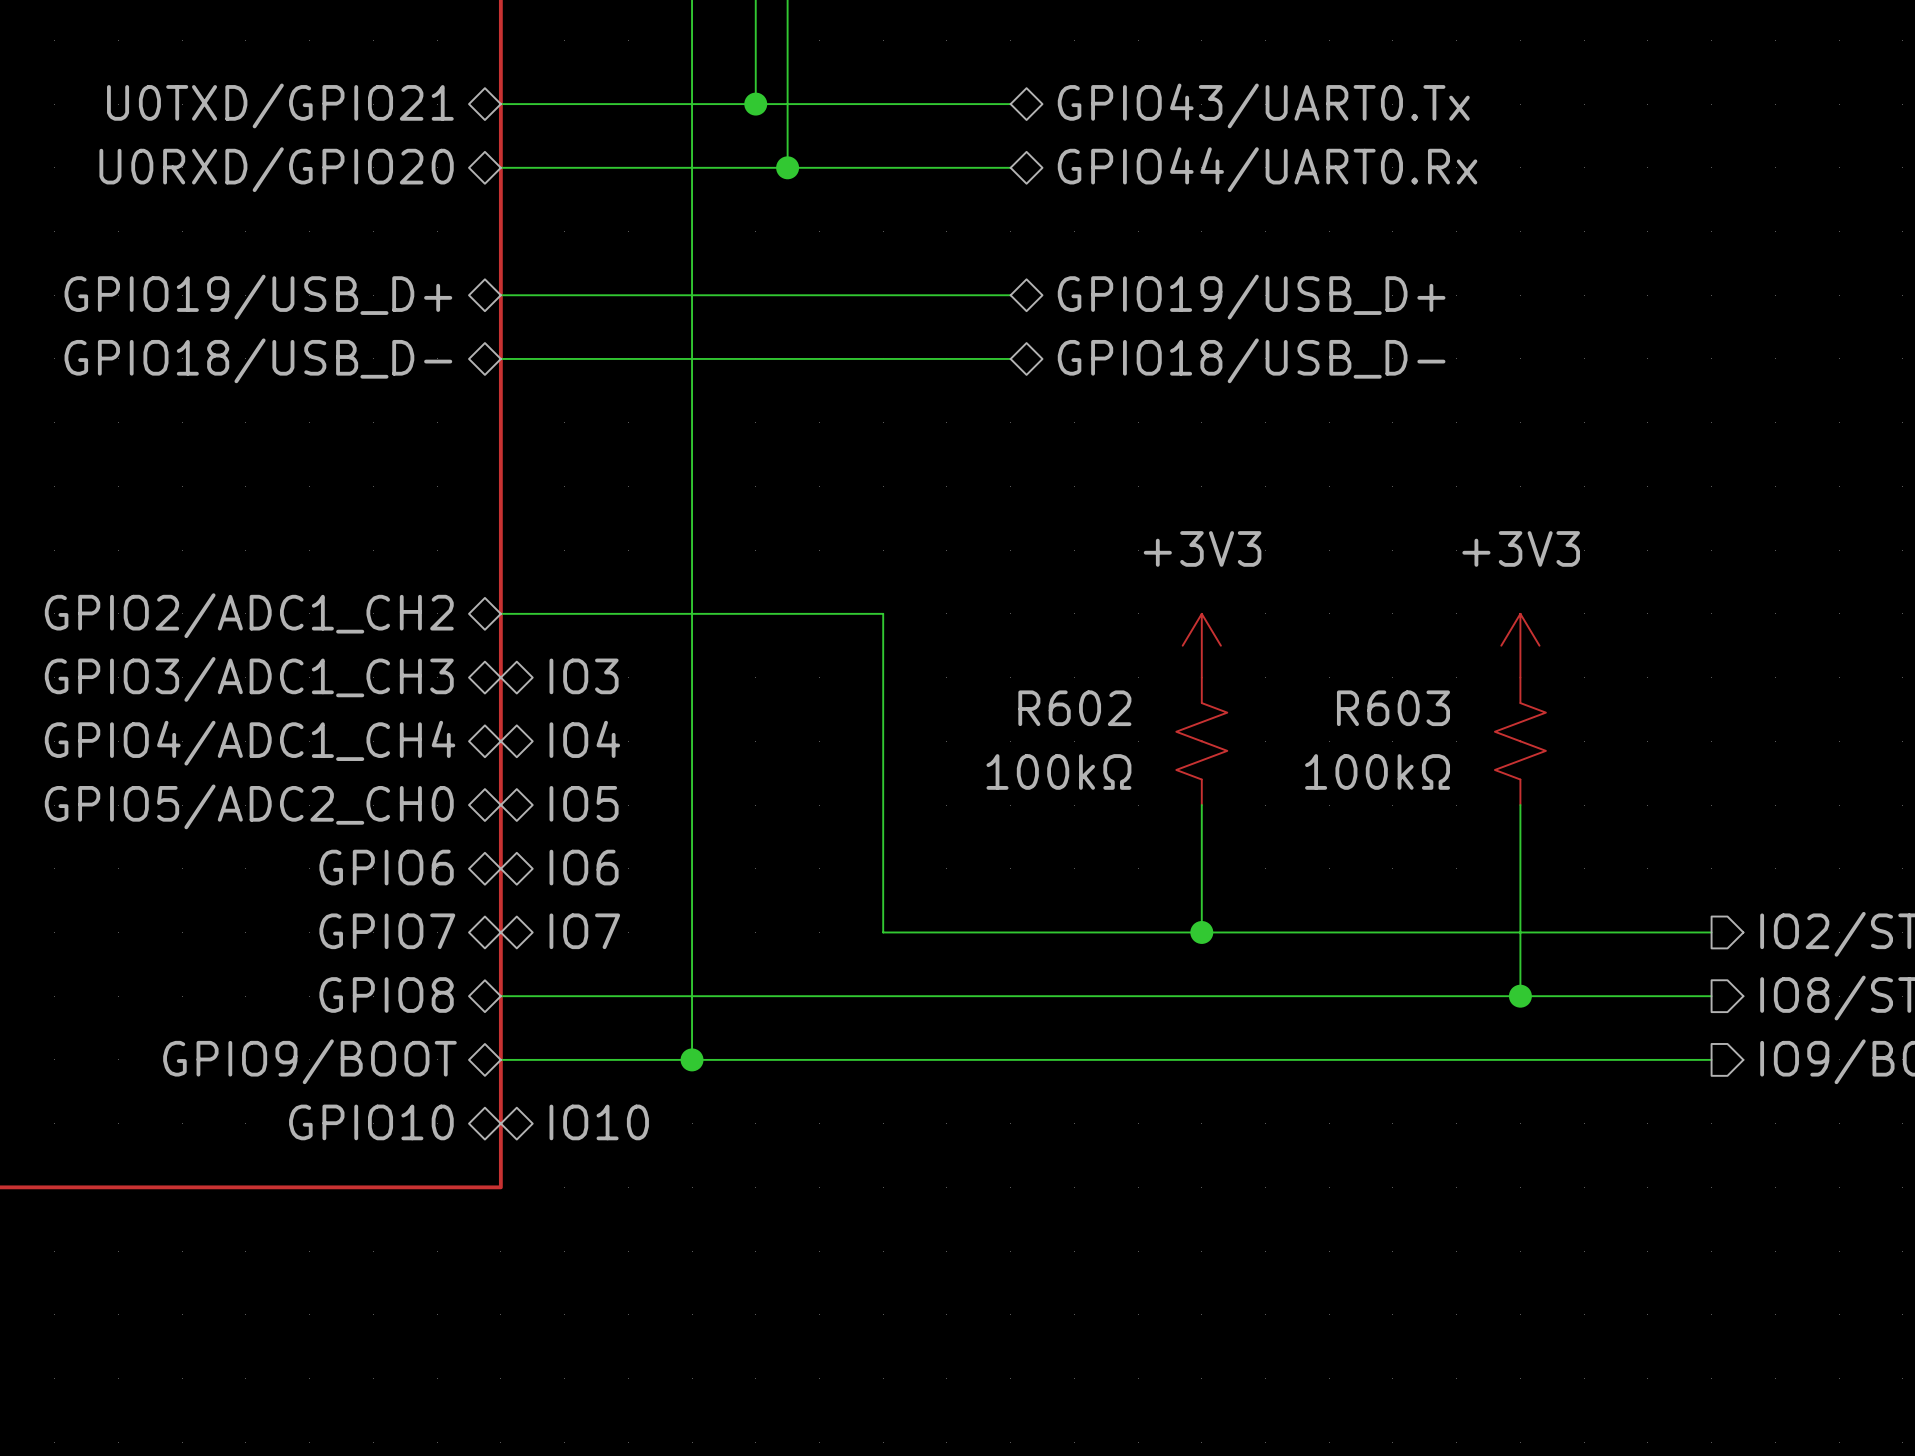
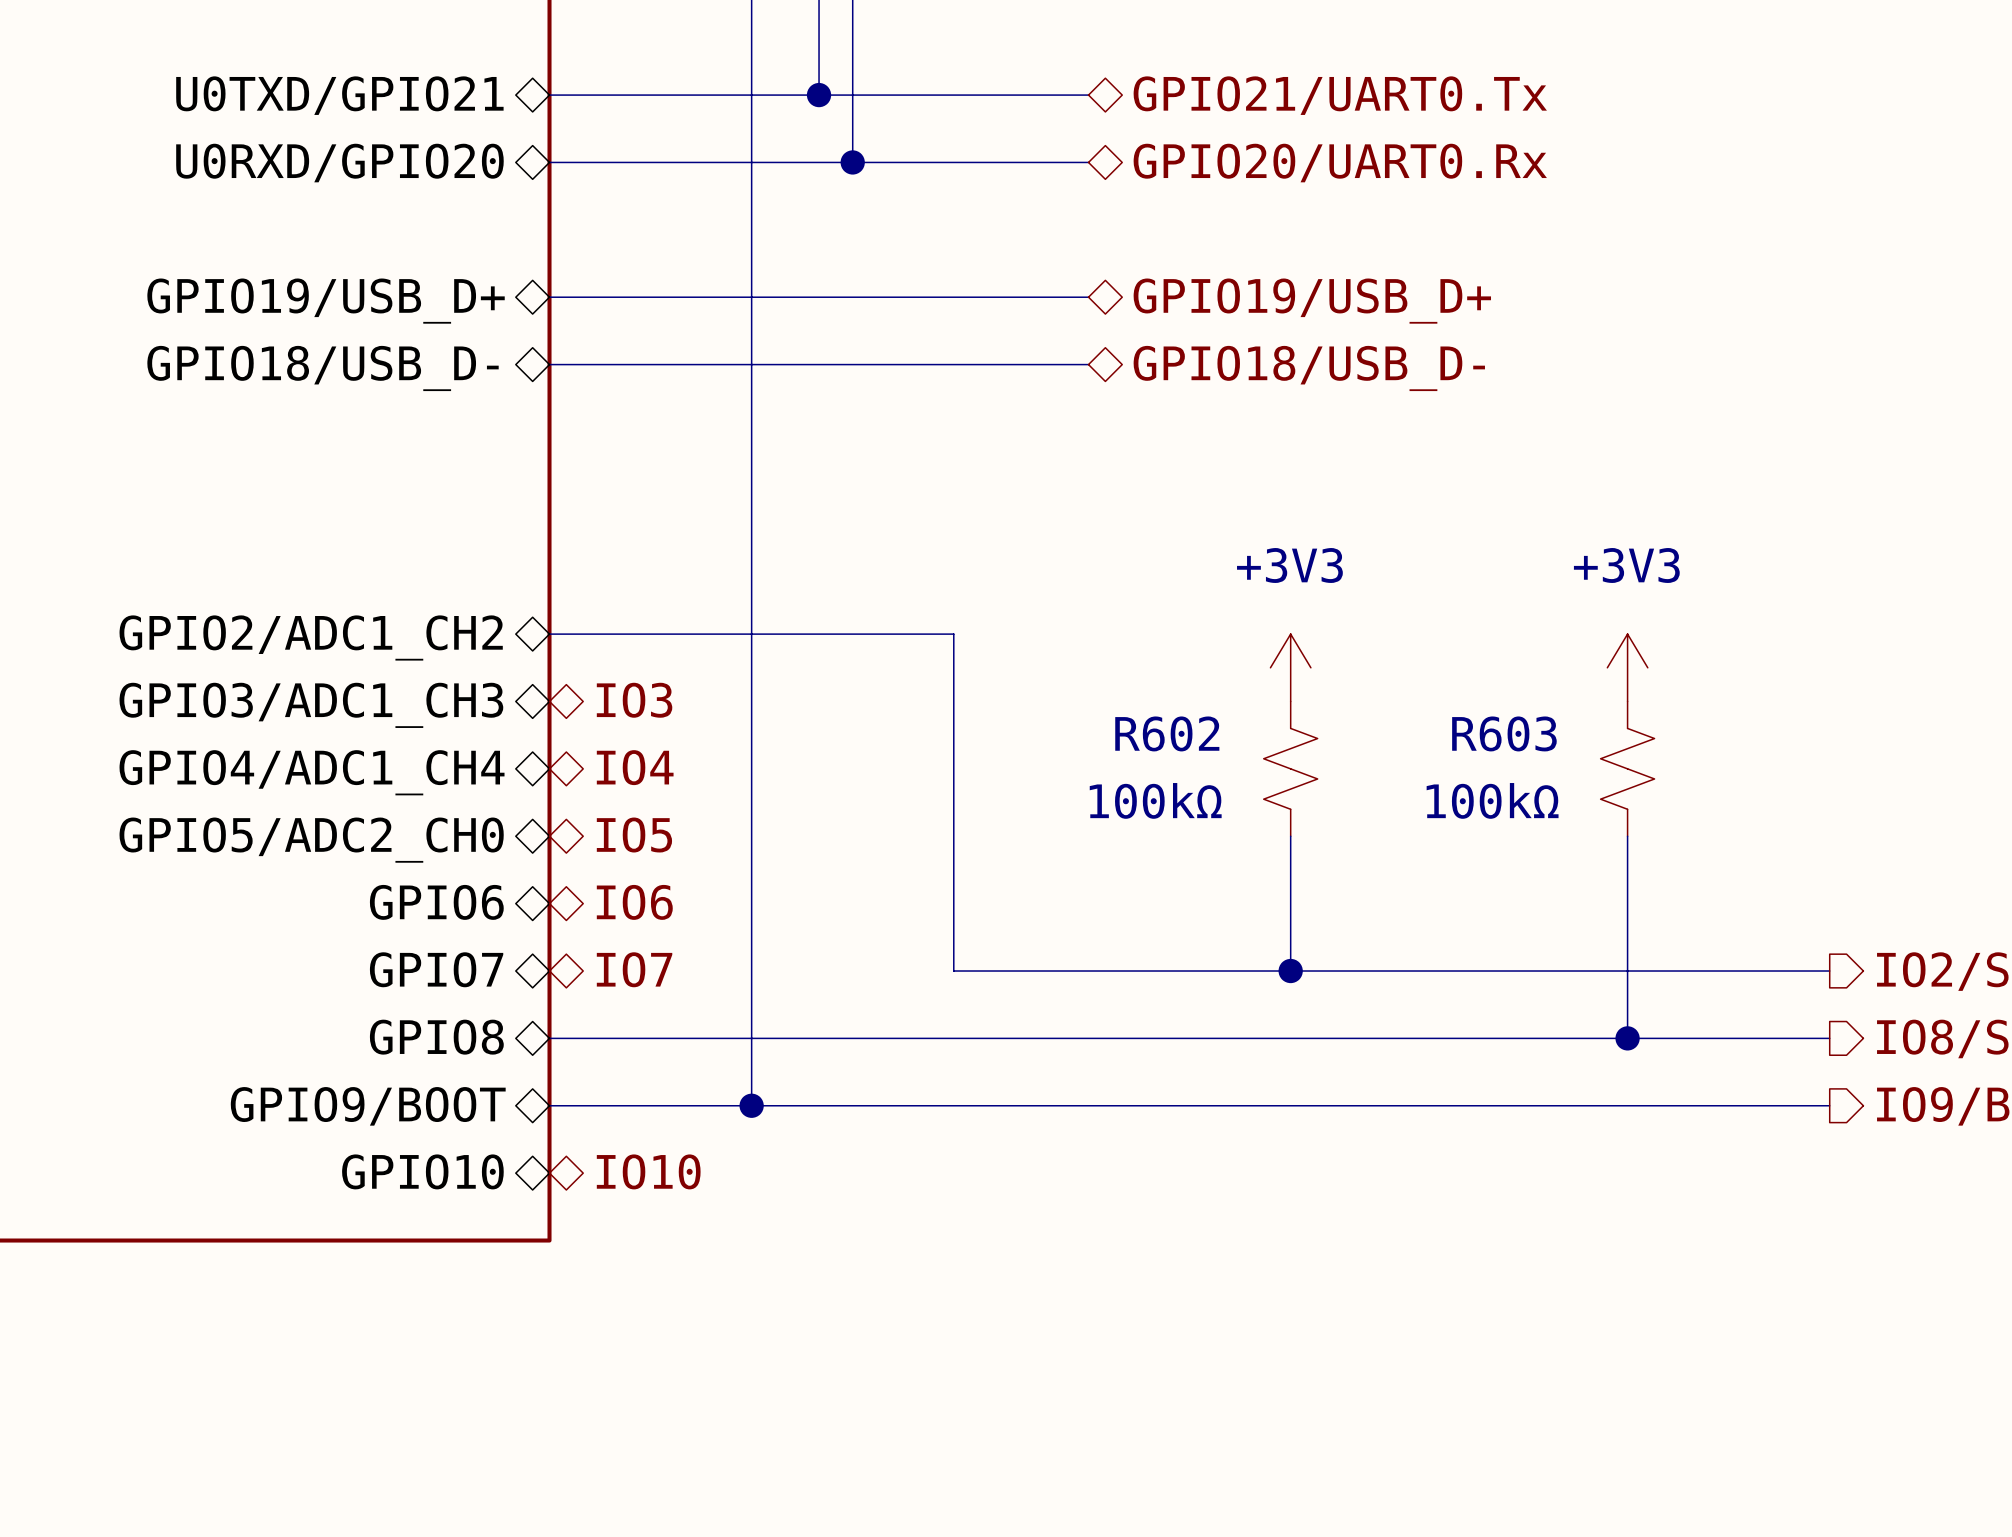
hierarchical label: GPIO43/UART0.Tx (1263, 105) -> GPIO21/UART0.Tx (1340, 95)
hierarchical label: GPIO44/UART0.Rx (1267, 169) -> GPIO20/UART0.Rx (1340, 163)

